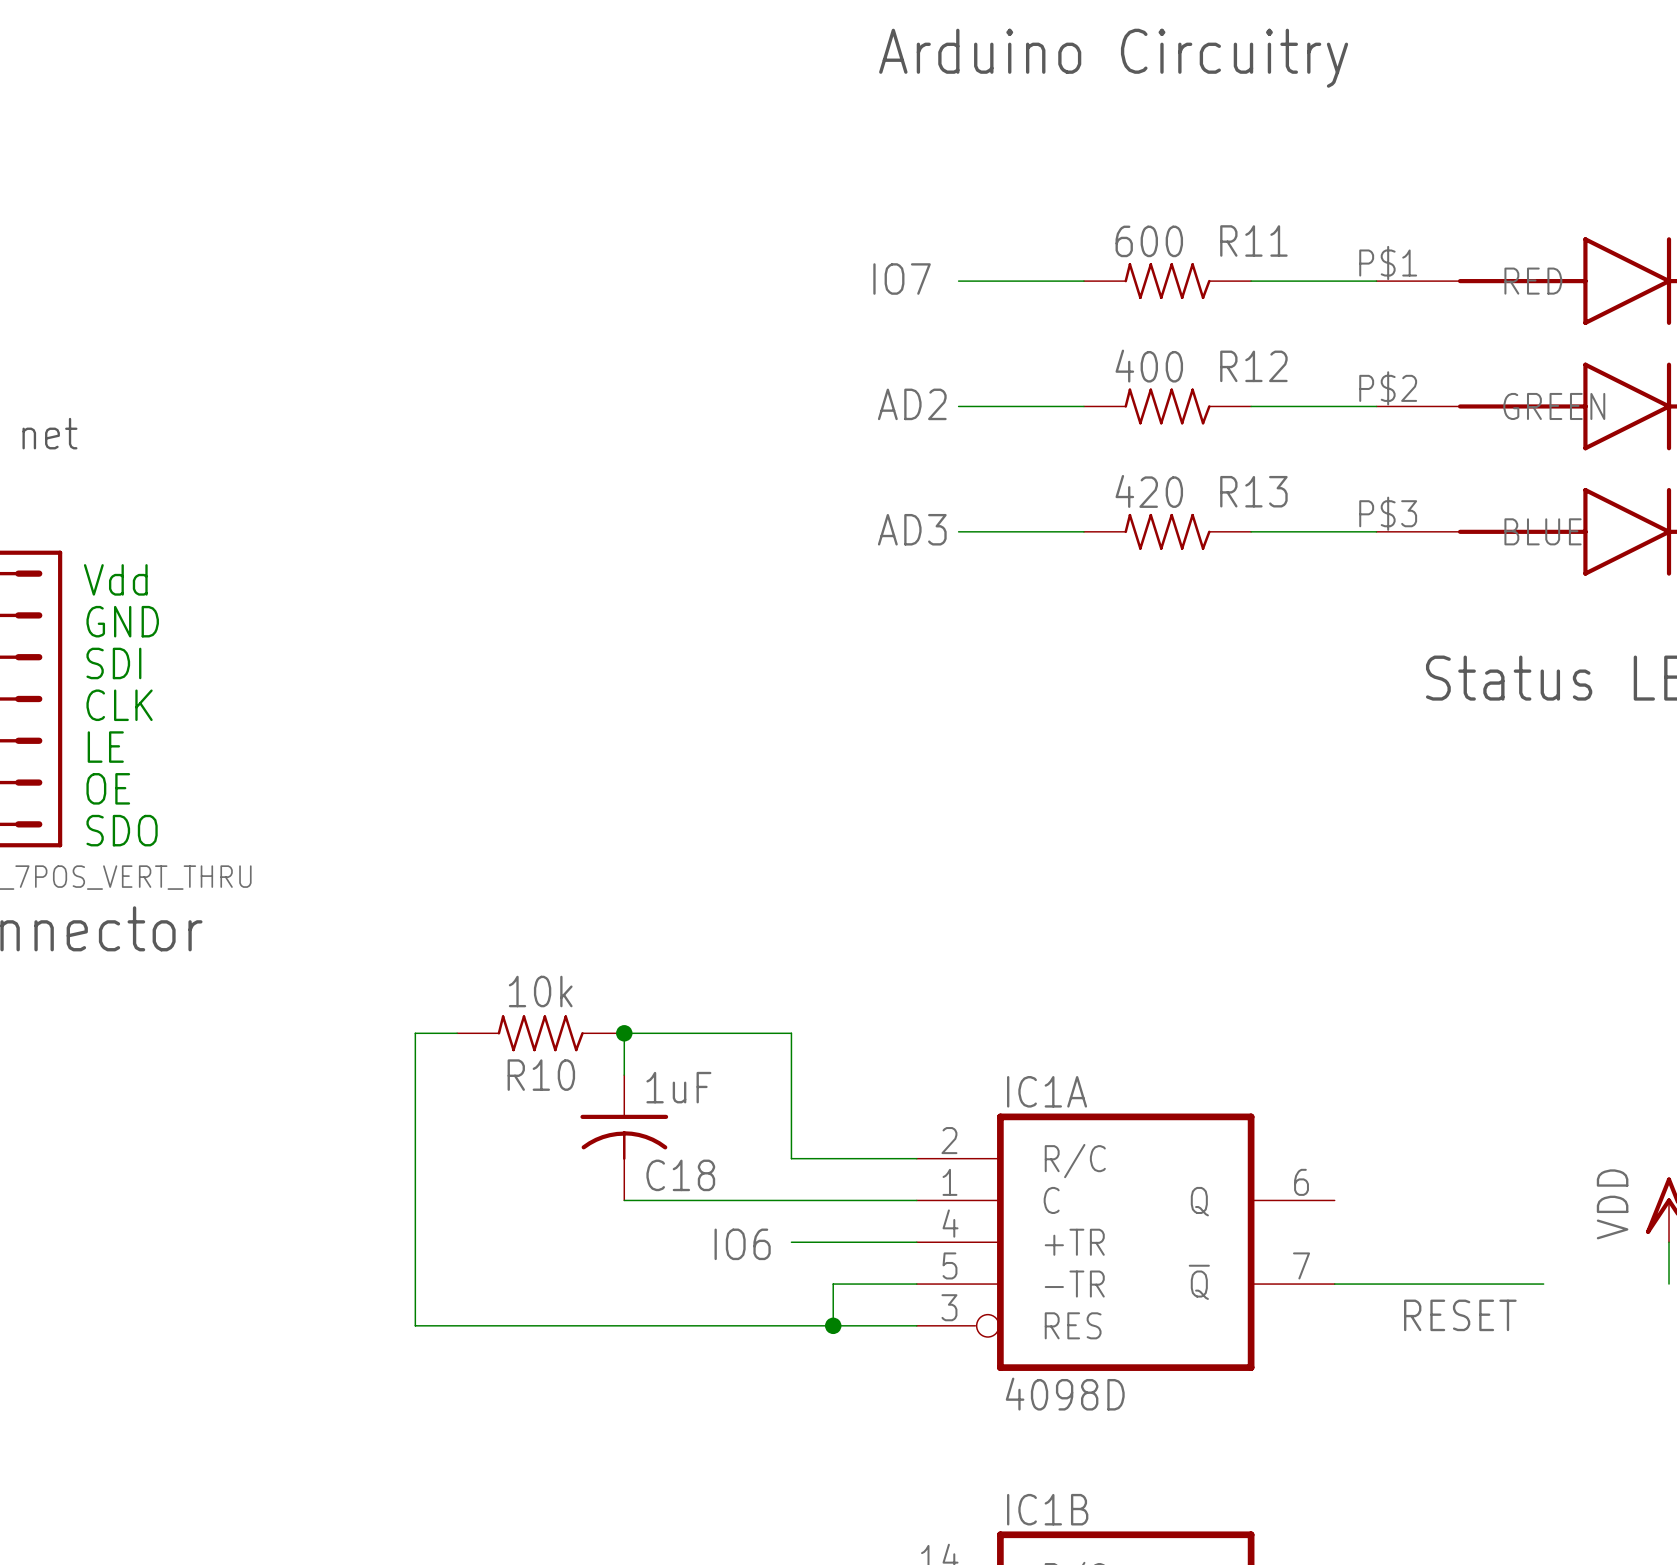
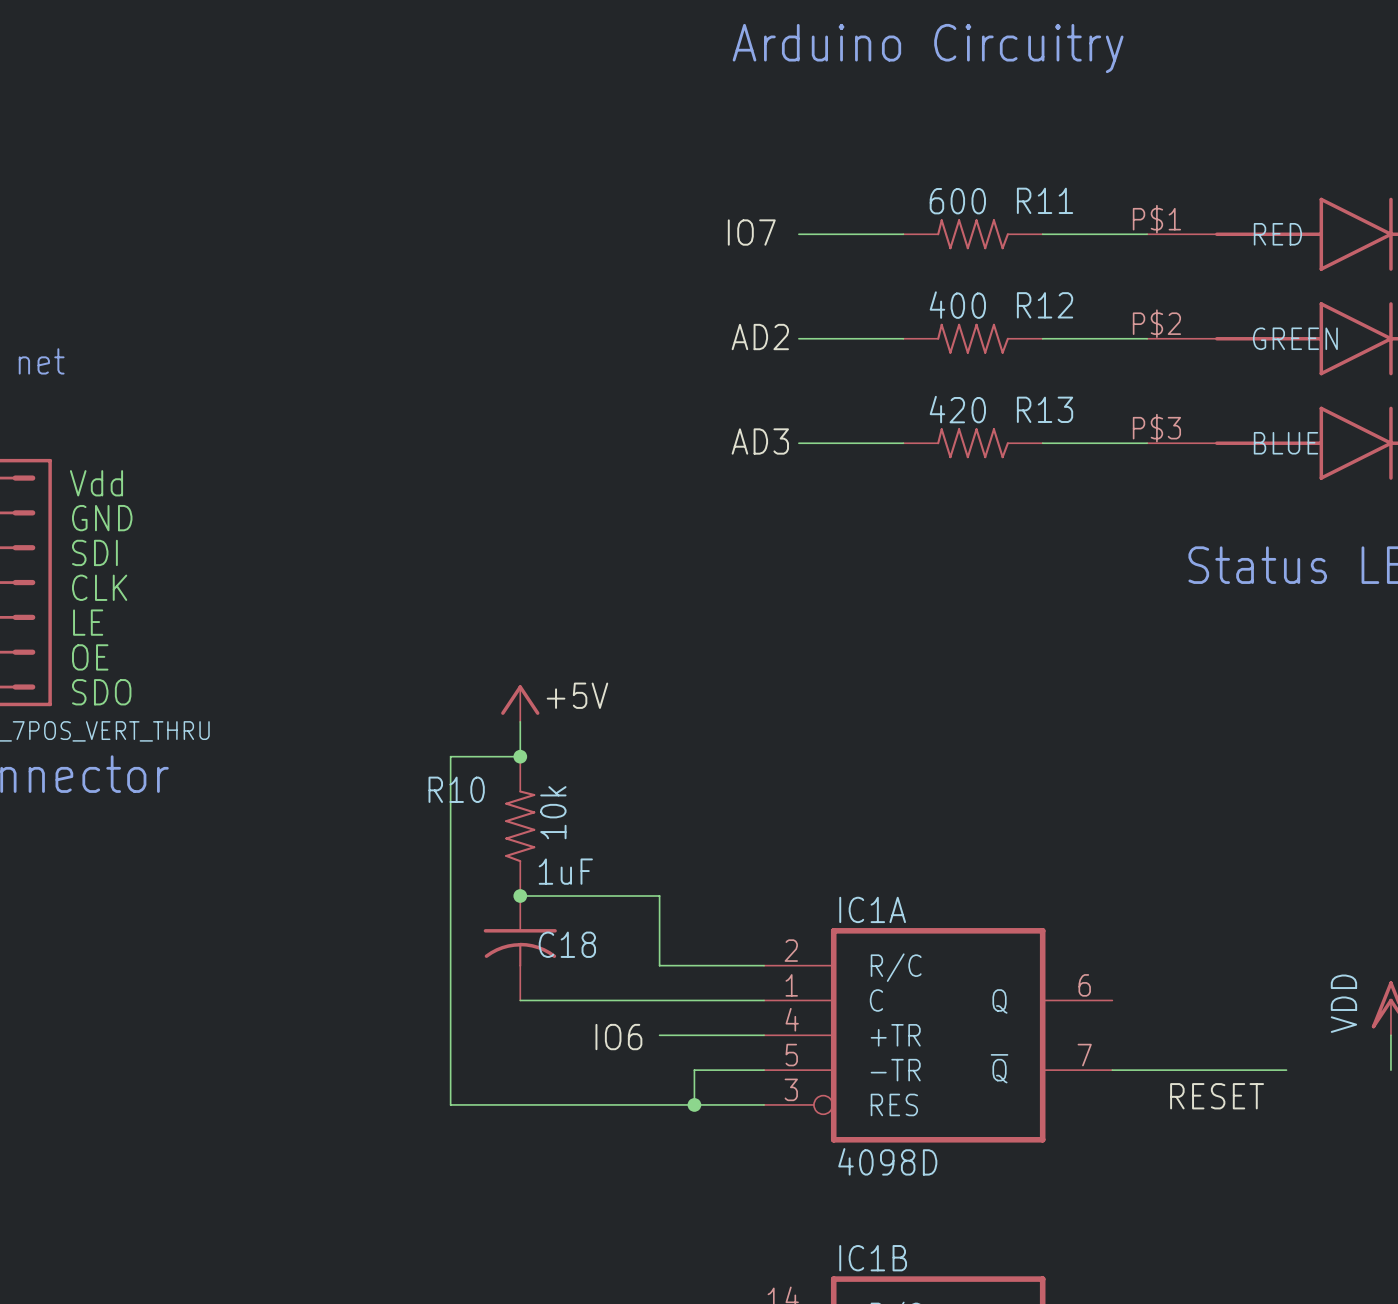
label: none -> +5V (577, 695)
power symbol: none -> (520, 703)
junction: none -> (520, 756)
wire: (457, 1033) (415, 1033) (415, 1325) (540, 1325) -> (520, 721) (520, 756) (450, 756) (450, 1104)
R10 rotation: 0° (540, 1033) -> 90° clockwise (520, 826)
junction position: (624, 1033) -> (520, 895)
R10 name position: R10 (541, 1075) -> R10 (456, 789)
wire: (624, 1075) (624, 1033) (791, 1033) (791, 1075) -> (520, 895) (659, 895)
C18 value position: 1uF (678, 1087) -> 1uF (565, 871)
C18 name position: C18 (680, 1175) -> C18 (567, 944)

